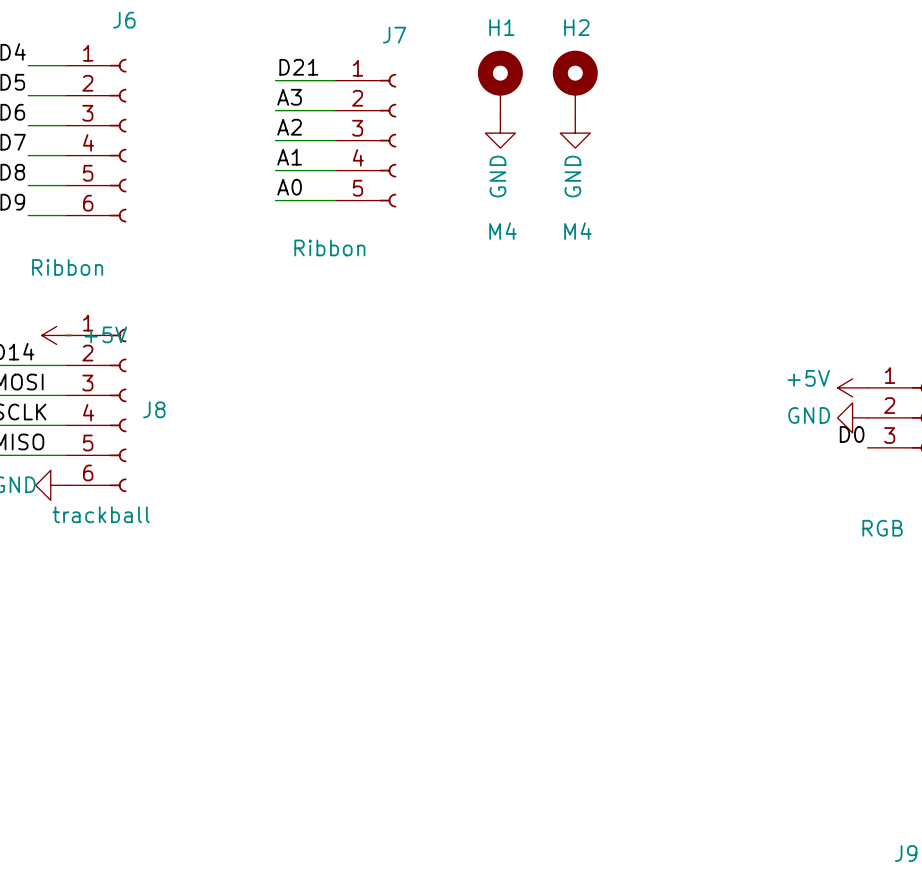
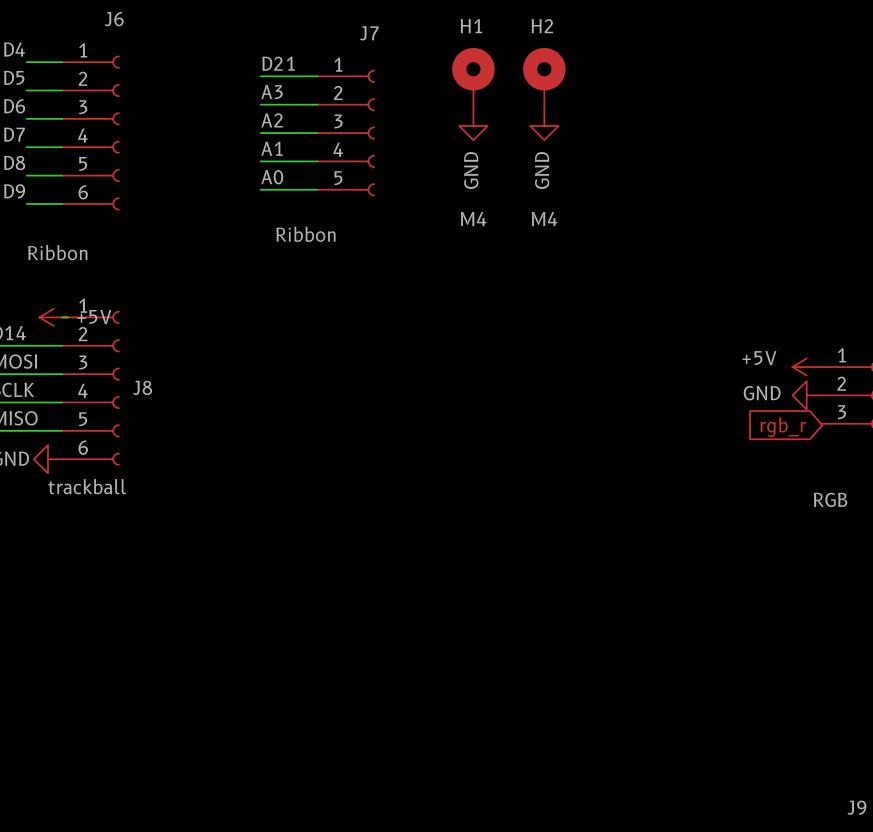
label: D0 (852, 434) -> none
global label: none -> rgb_r (783, 427)

